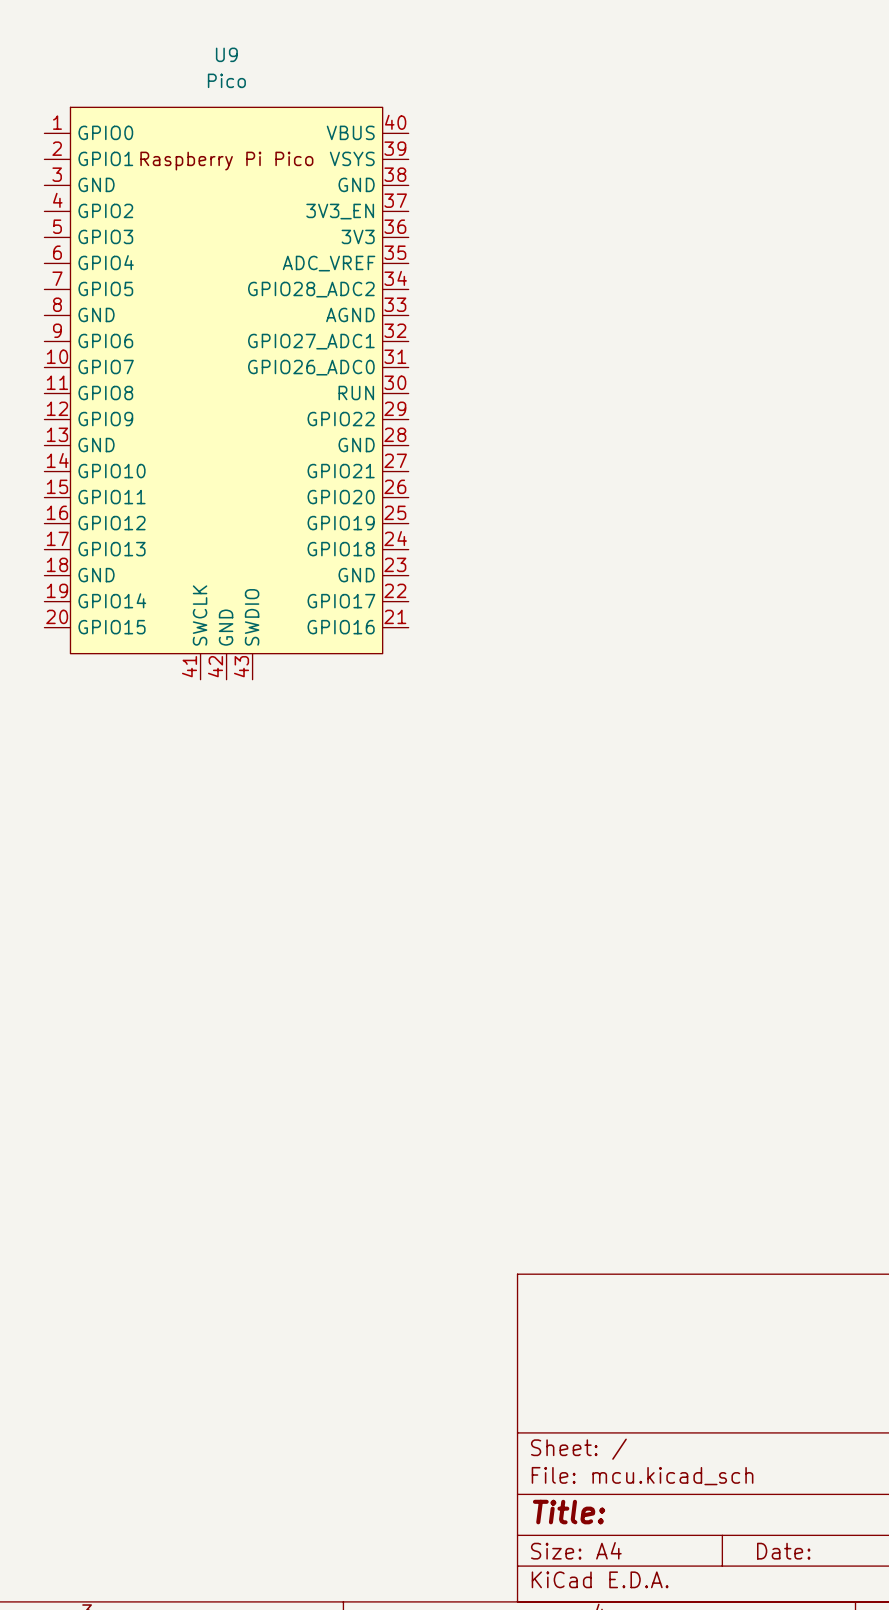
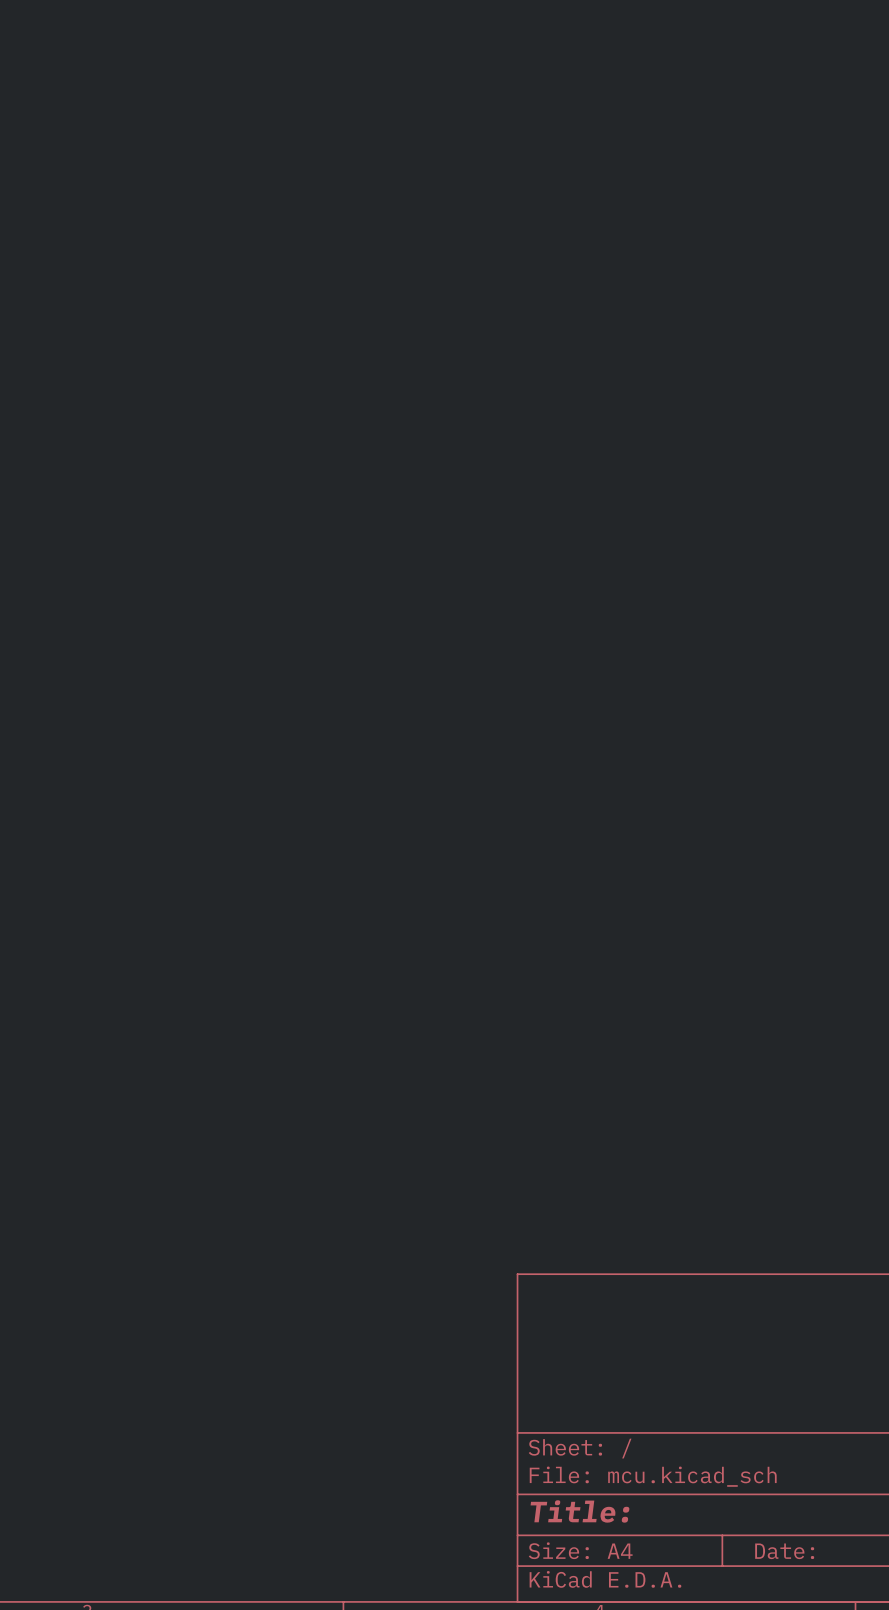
U9: Pico (226, 393) -> none

